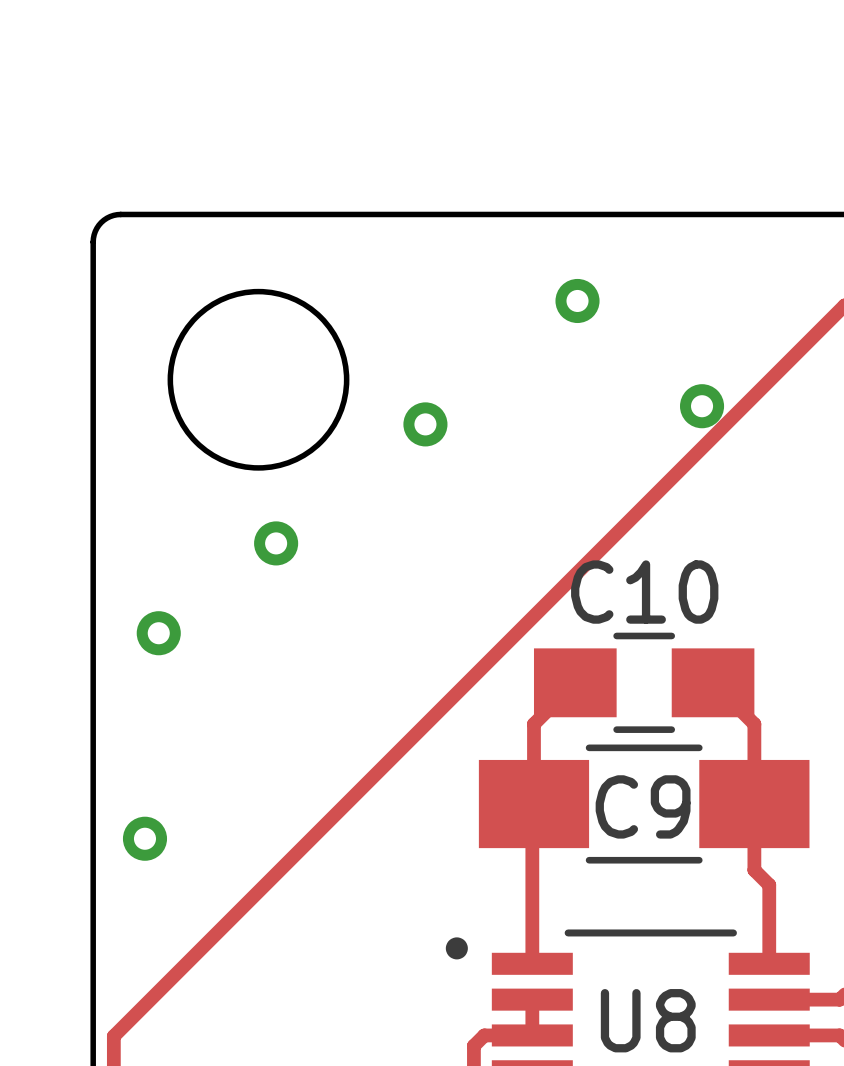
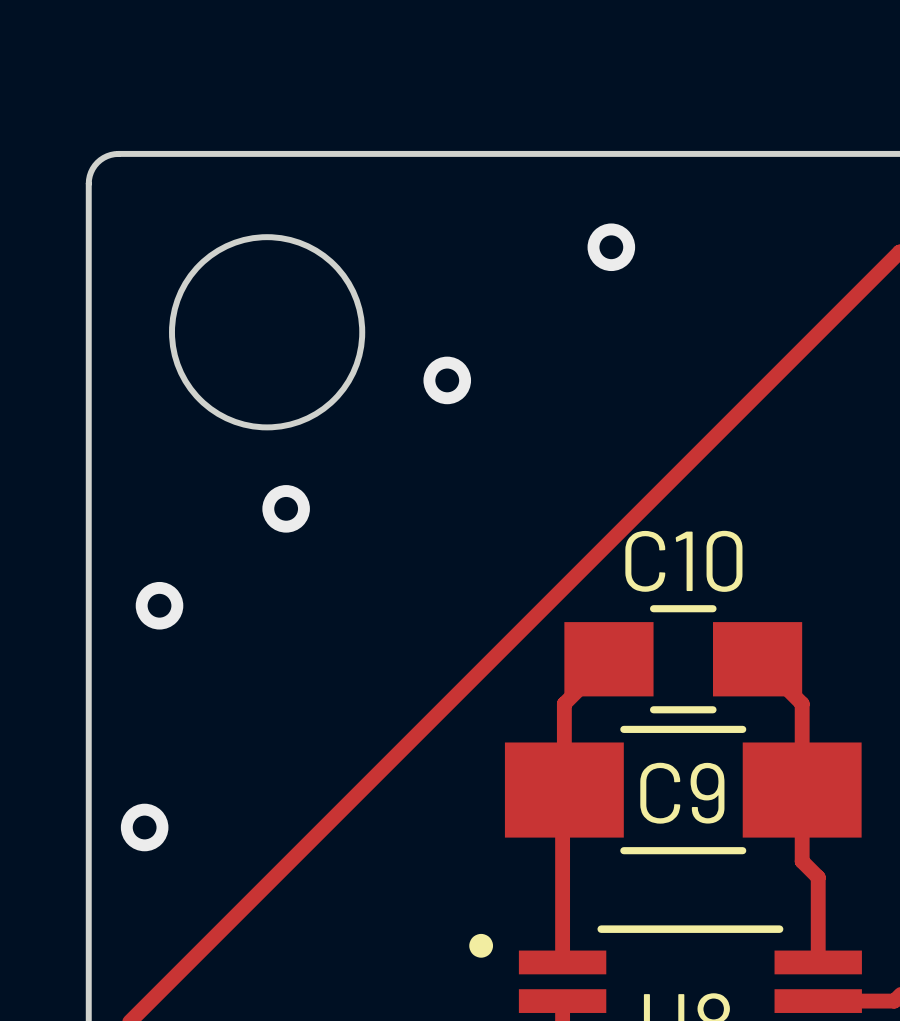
via: (702, 406) -> none

